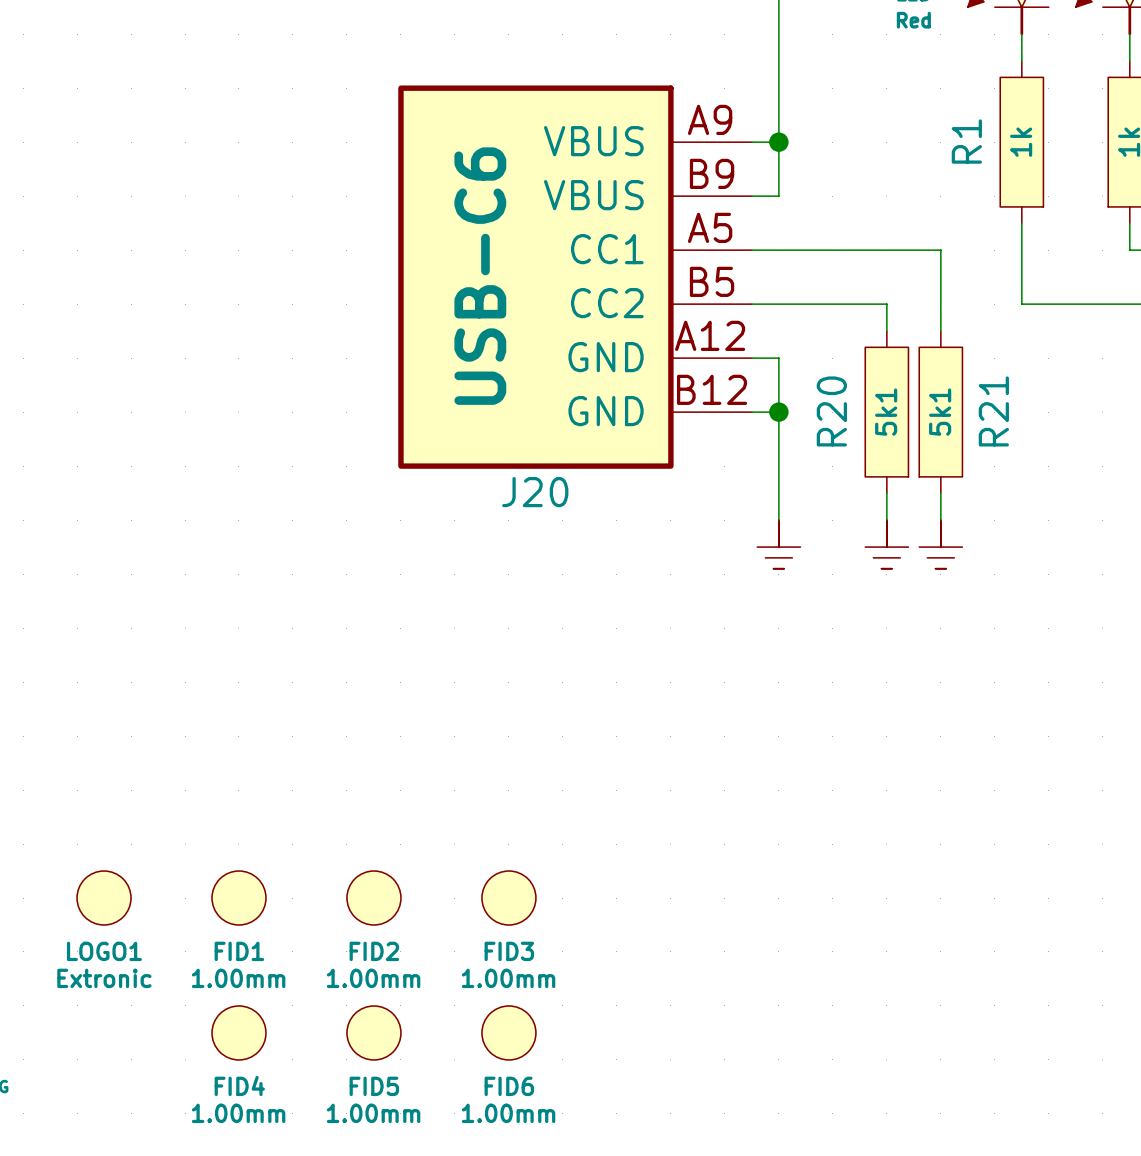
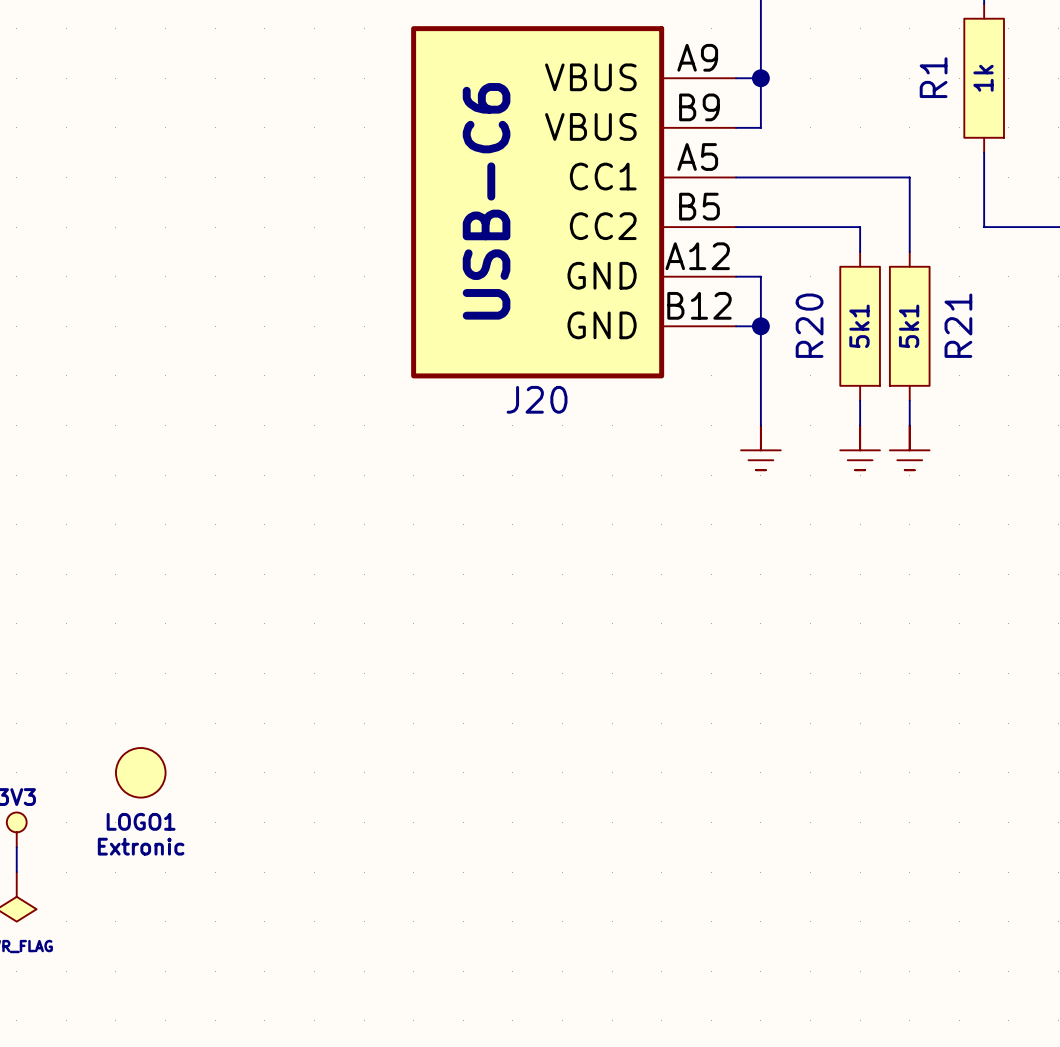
FID1: 1.00mm (238, 898) -> none
FID2: 1.00mm (373, 898) -> none
FID3: 1.00mm (508, 898) -> none
FID4: 1.00mm (238, 1032) -> none
FID5: 1.00mm (373, 1032) -> none
FID6: 1.00mm (508, 1032) -> none

